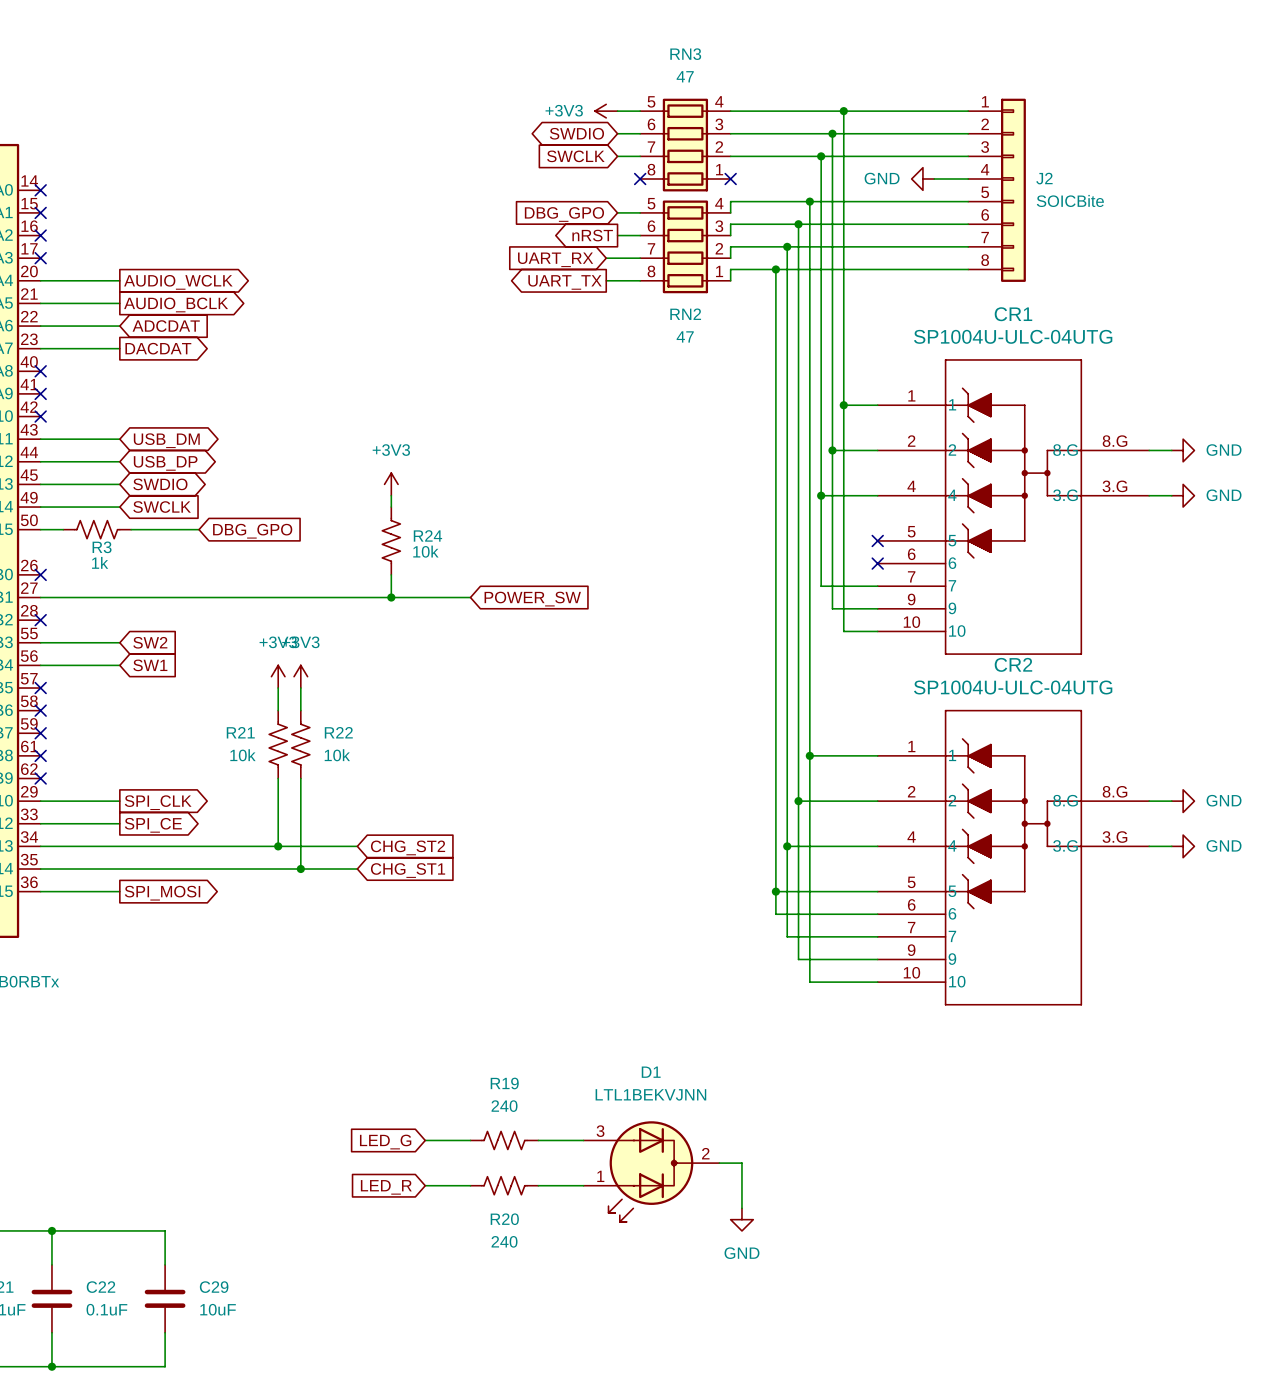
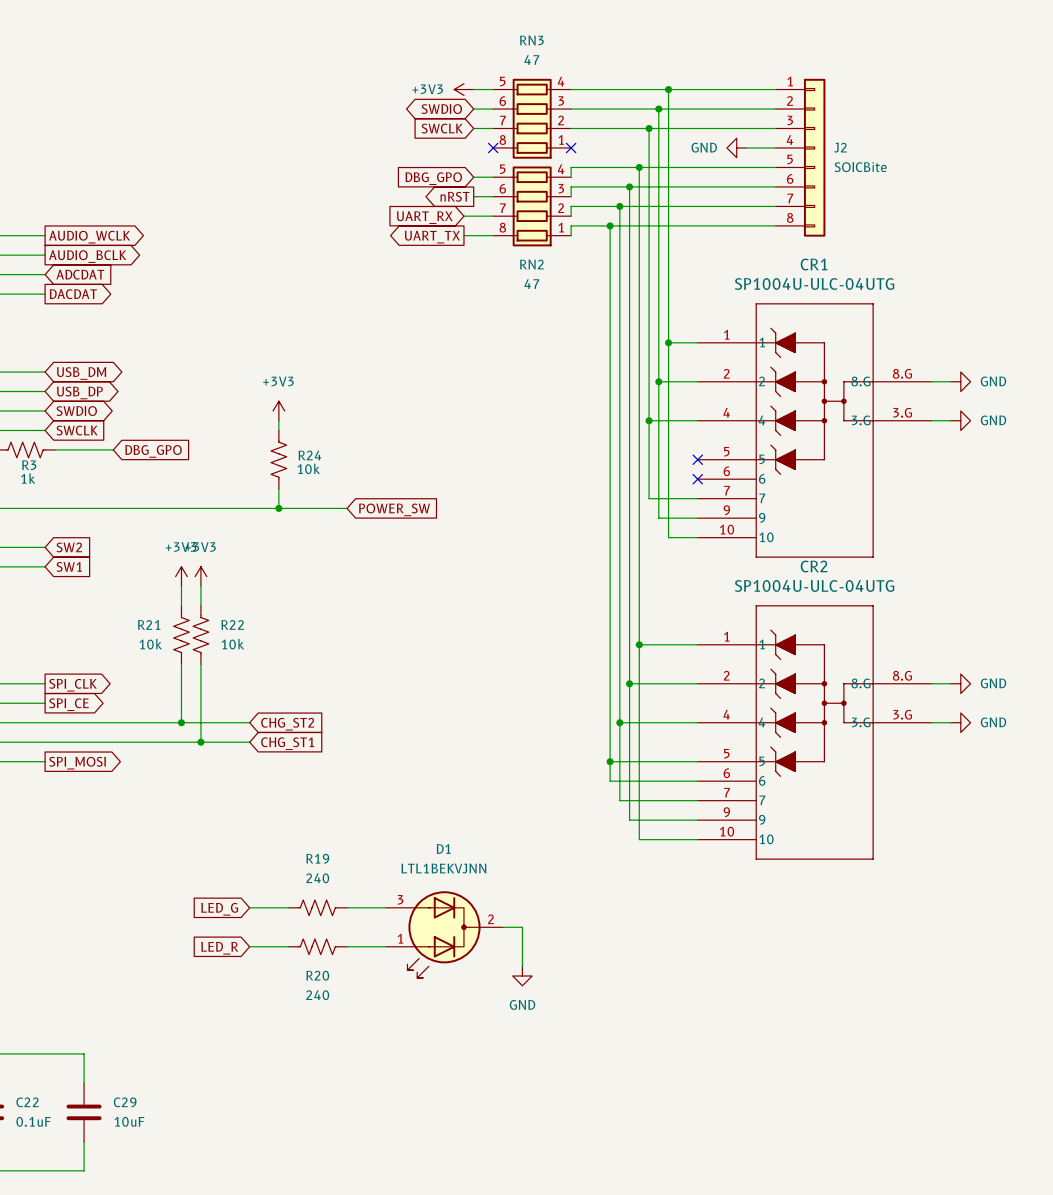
wire: (425, 1140) (470, 1140) -> (347, 946) (386, 946)
R19 position: (504, 1140) -> (317, 907)
wire: (538, 1140) (583, 1140) -> (347, 907) (386, 907)
global label position: LED_G (385, 1142) -> LED_G (219, 909)
wire: (719, 1163) (741, 1163) (741, 1208) -> (502, 927) (522, 927) (522, 966)
D1 position: (651, 1171) -> (444, 934)
wire: (425, 1185) (470, 1185) -> (249, 946) (288, 946)
R20 position: (504, 1185) -> (317, 946)
wire: (538, 1185) (583, 1185) -> (249, 907) (288, 907)
global label position: LED_R (386, 1187) -> LED_R (219, 948)
power symbol position: GND (741, 1219) -> GND (522, 976)

